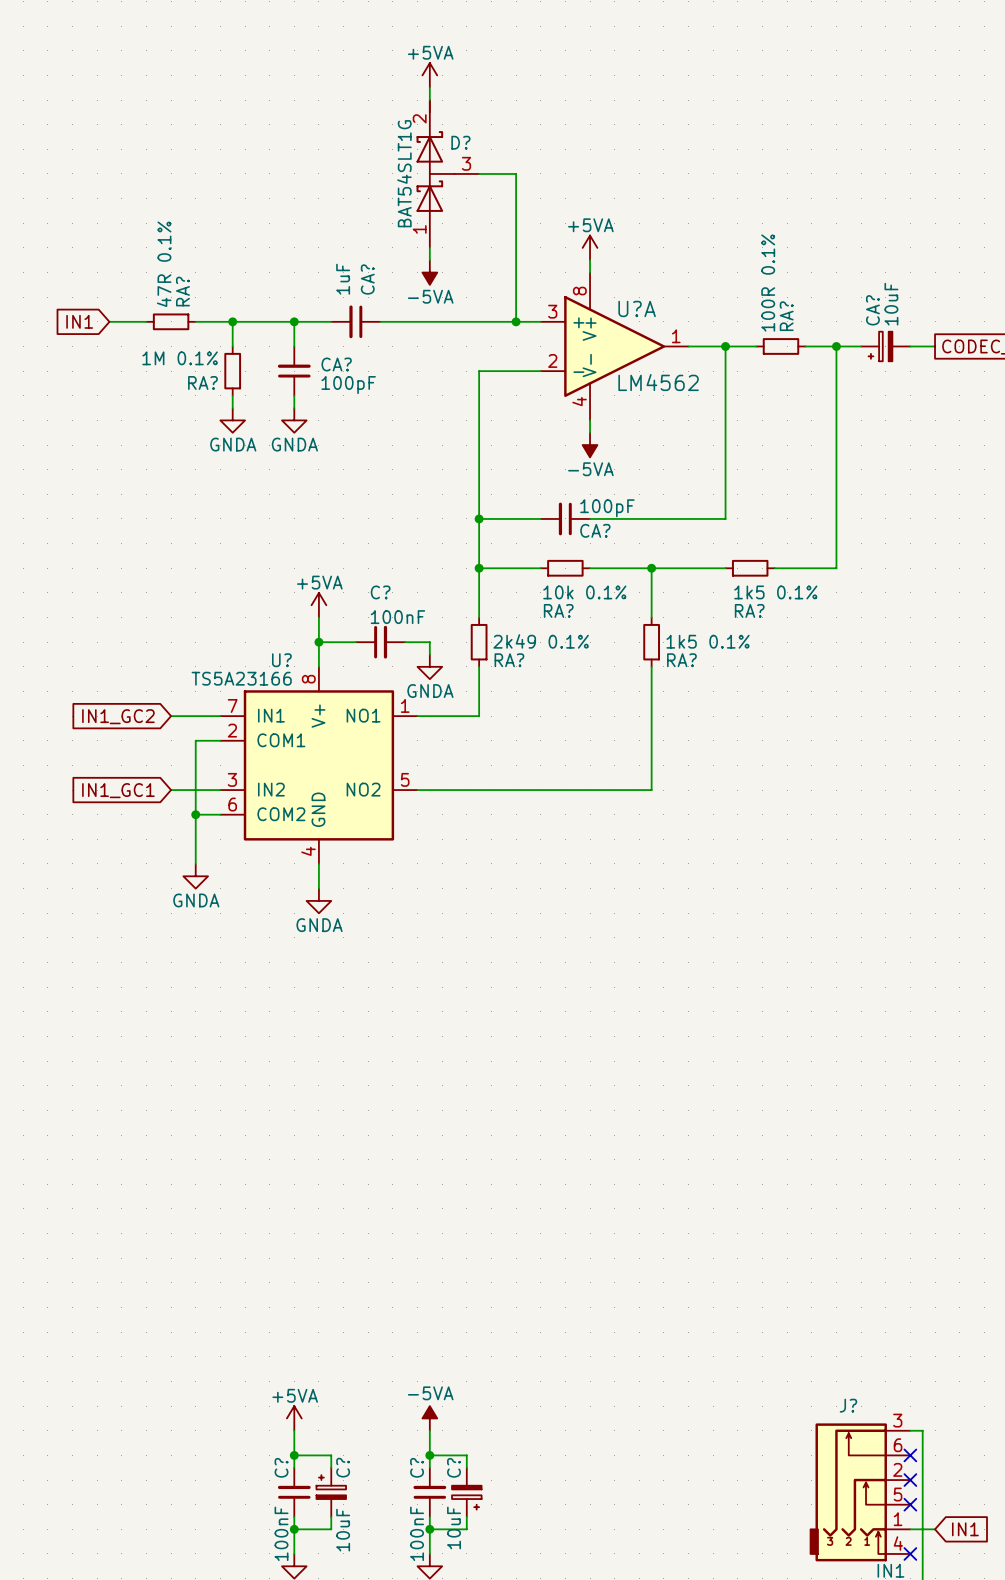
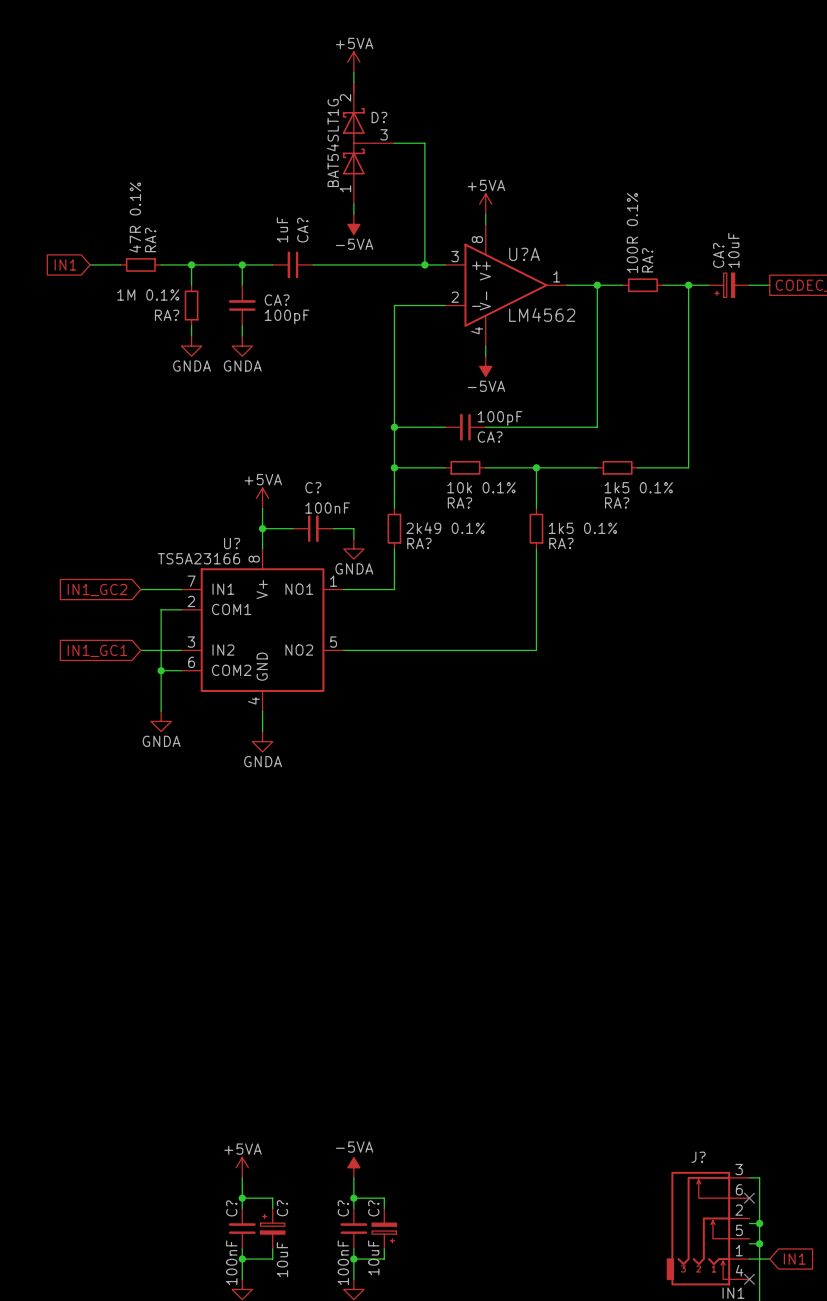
no-connect mark: (910, 1480) -> none
wire: none -> (749, 1223) (759, 1223)
junction: none -> (759, 1223)
no-connect mark: (910, 1504) -> none
wire: none -> (749, 1243) (759, 1243)
junction: none -> (759, 1243)

